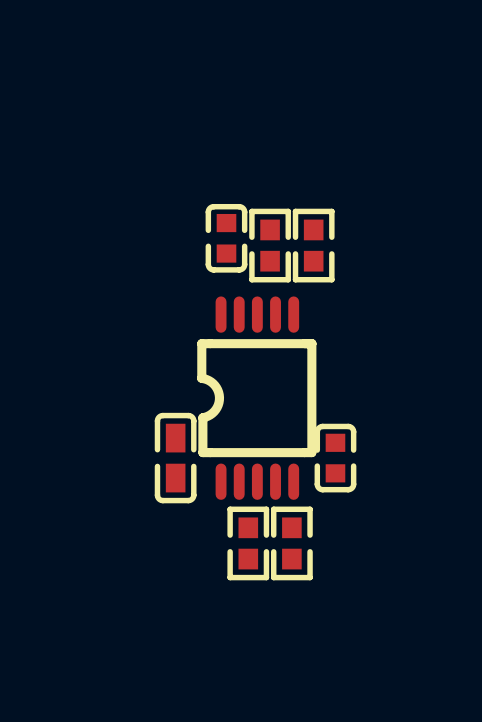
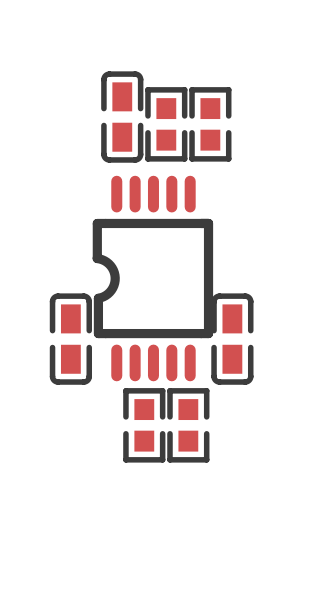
part footprint: [205, 203, 248, 273] -> [101, 71, 144, 163]
part footprint: [314, 423, 357, 493] -> [211, 293, 254, 385]

